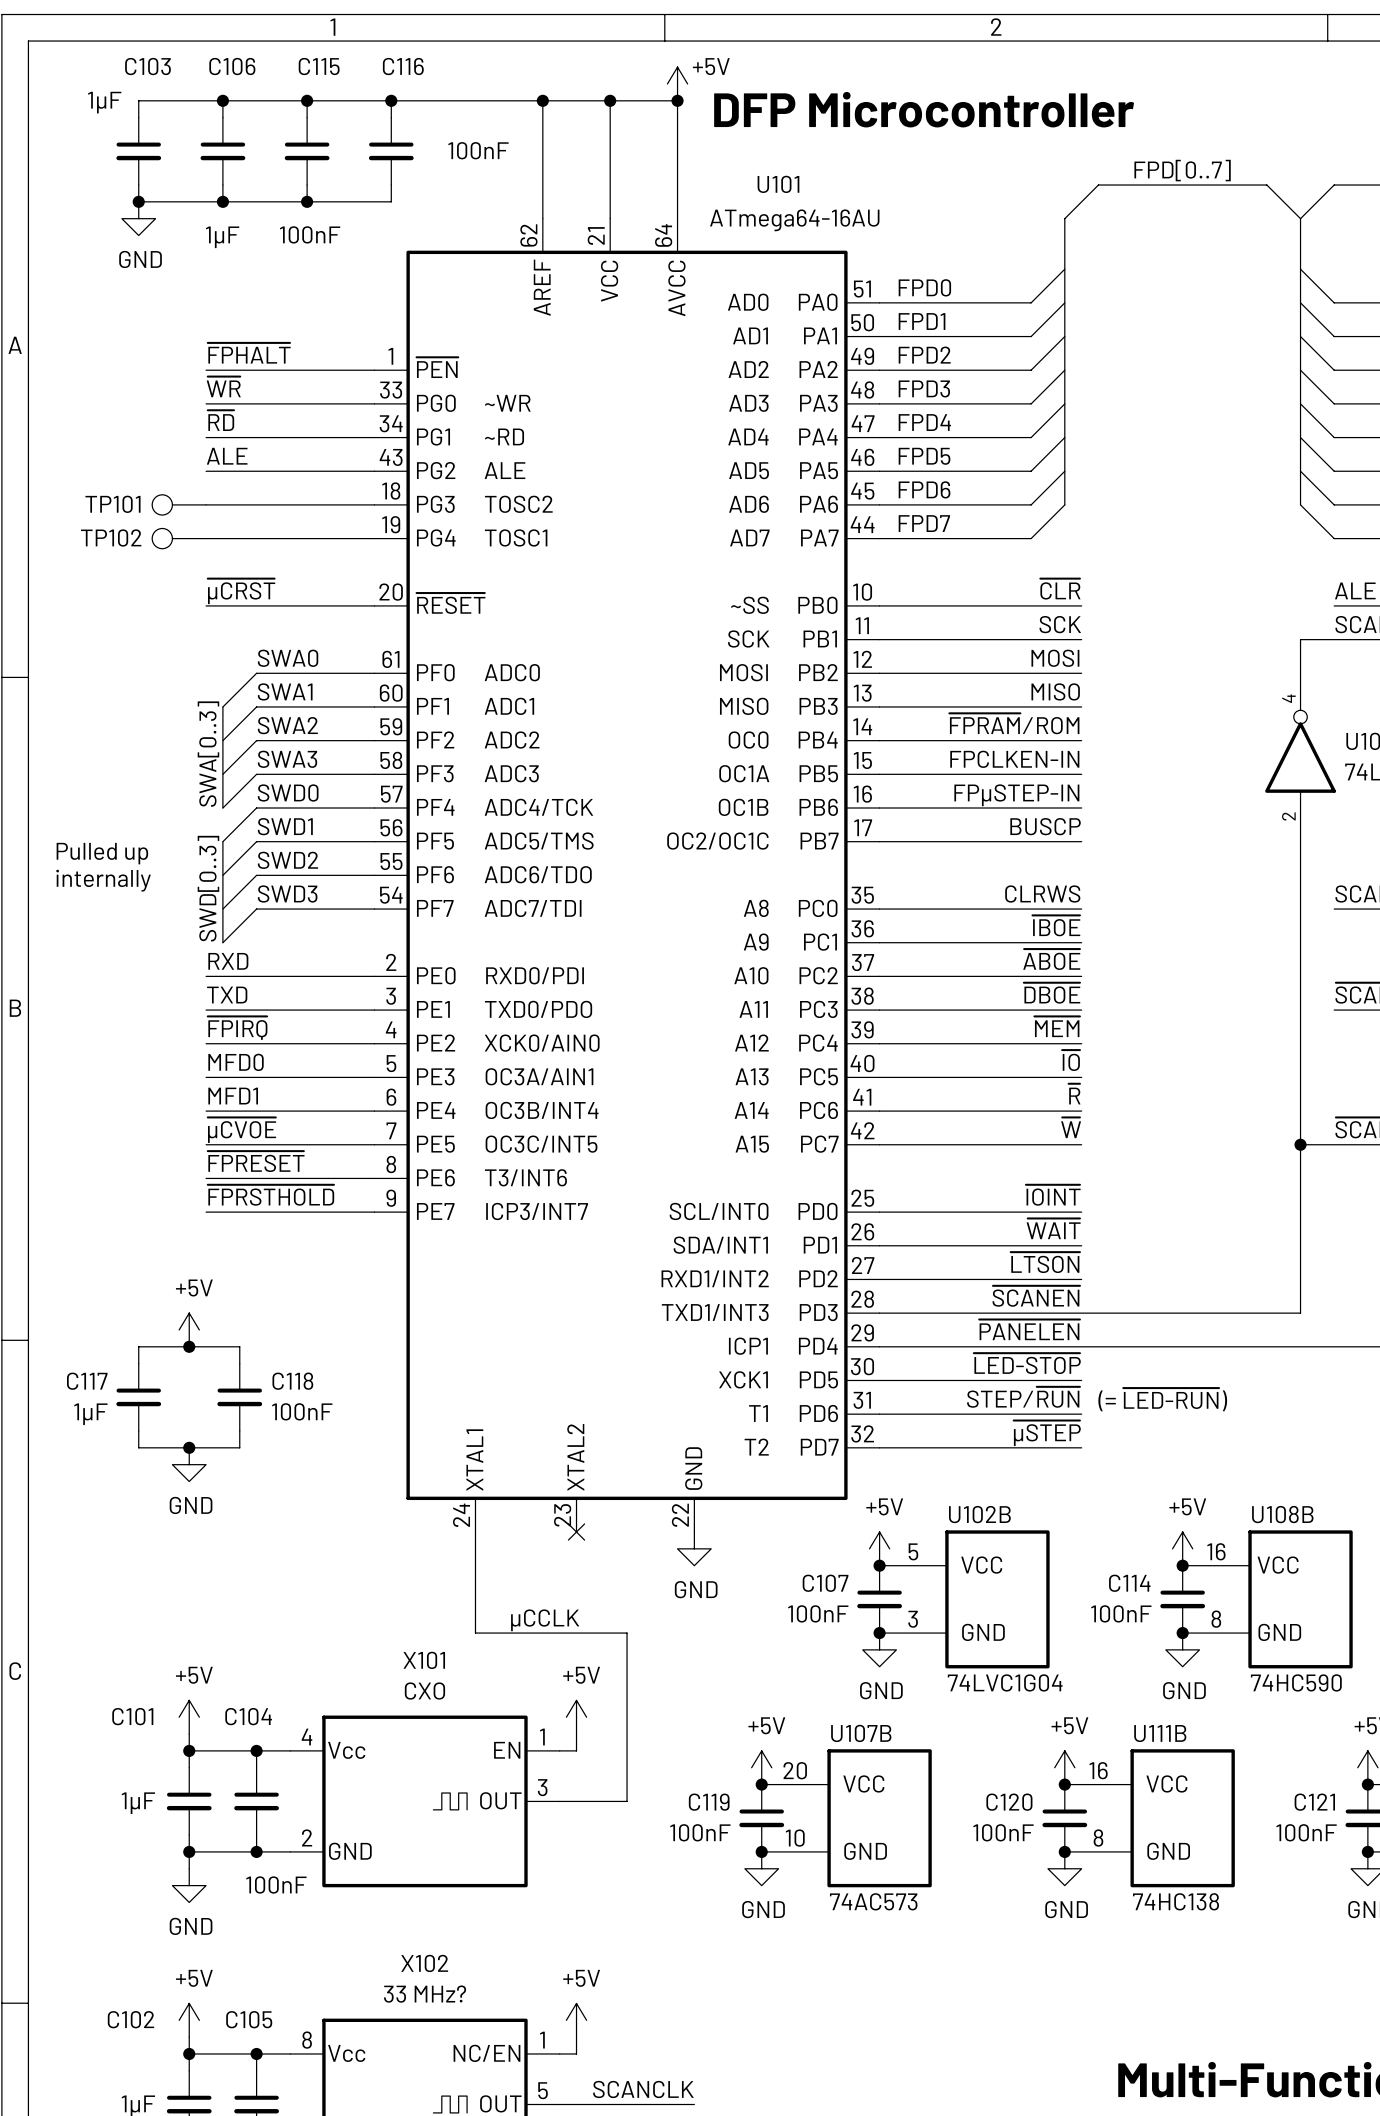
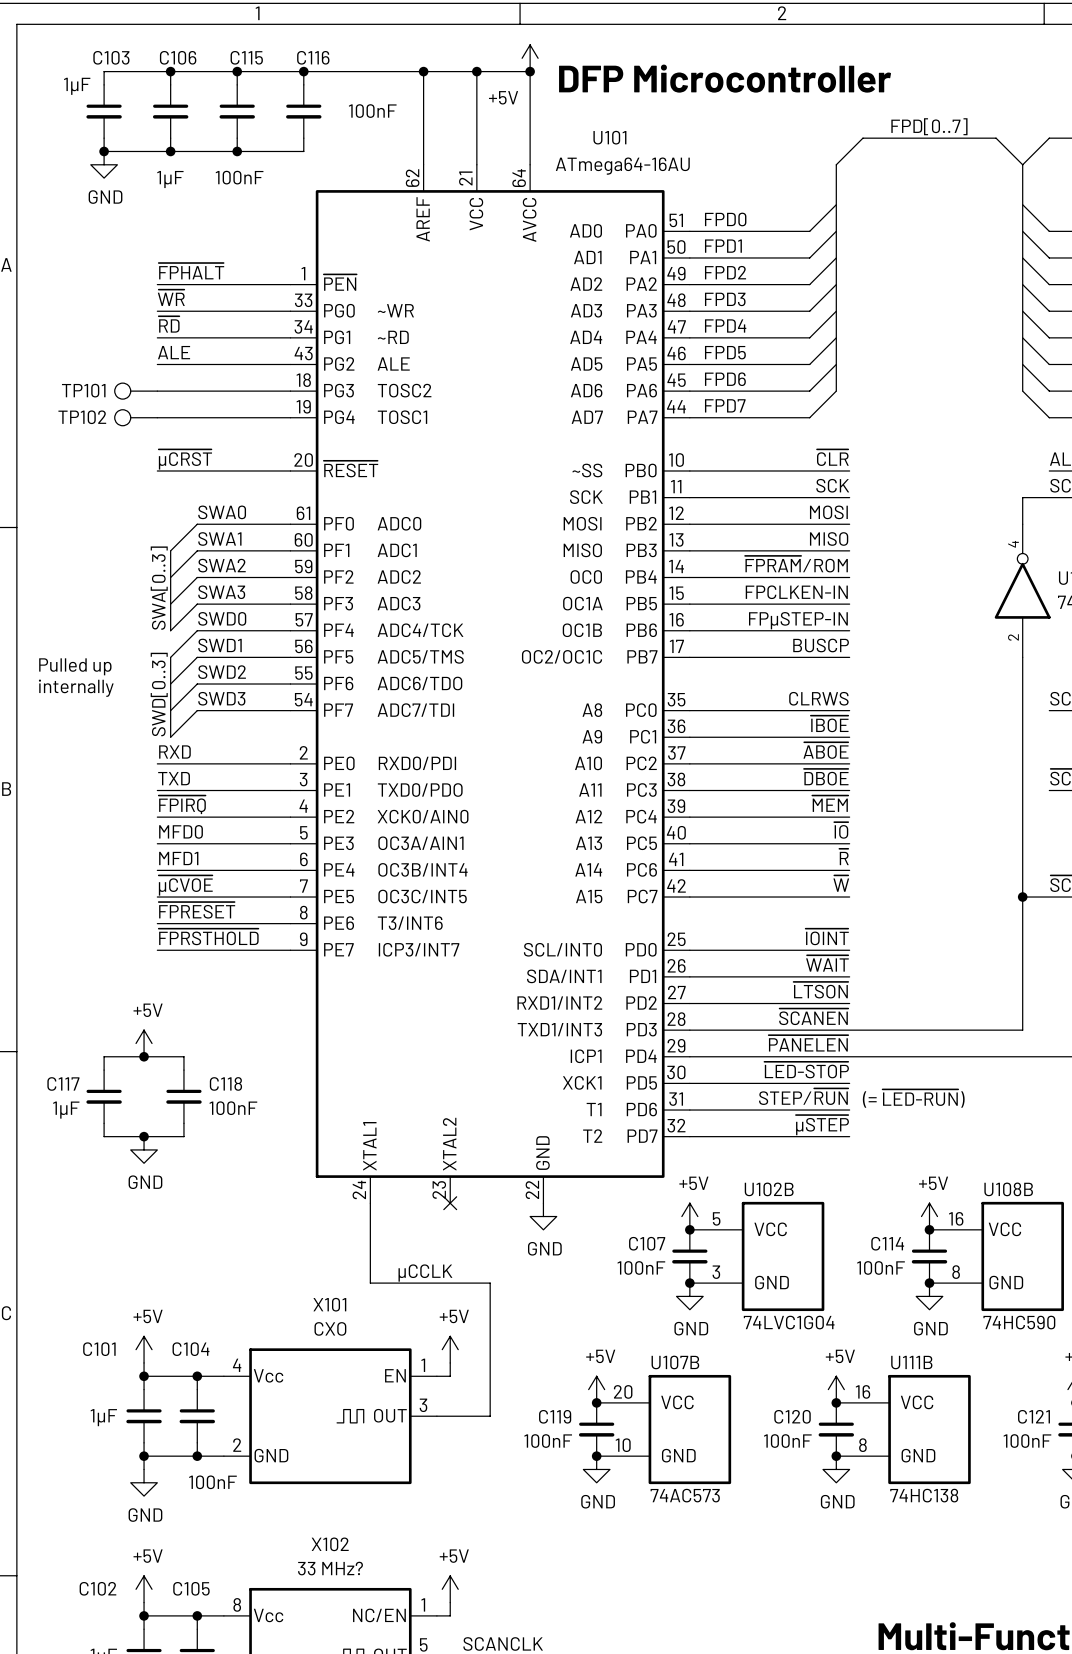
C103 name position: C103 (147, 66) -> C103 (111, 57)
C106 name position: C106 (232, 66) -> C106 (178, 57)
C115 name position: C115 (319, 66) -> C115 (246, 57)
C116 name position: C116 (403, 66) -> C116 (313, 57)
power symbol text position: +5V (711, 66) -> +5V (503, 97)
C103 value position: 1µF (104, 102) -> 1µF (77, 86)

